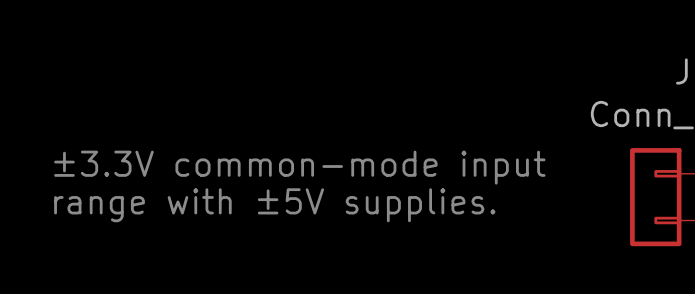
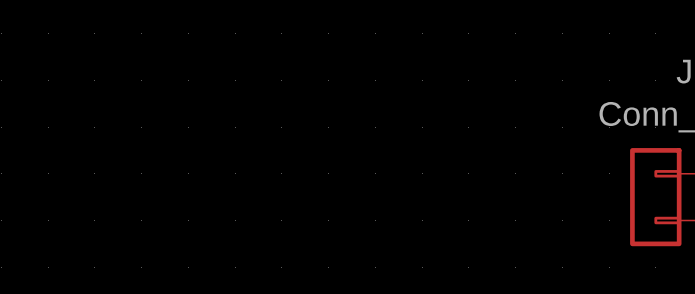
text: ±3.3V common-mode input (299, 167) -> none
text: range with ±5V supplies. (274, 205) -> none

